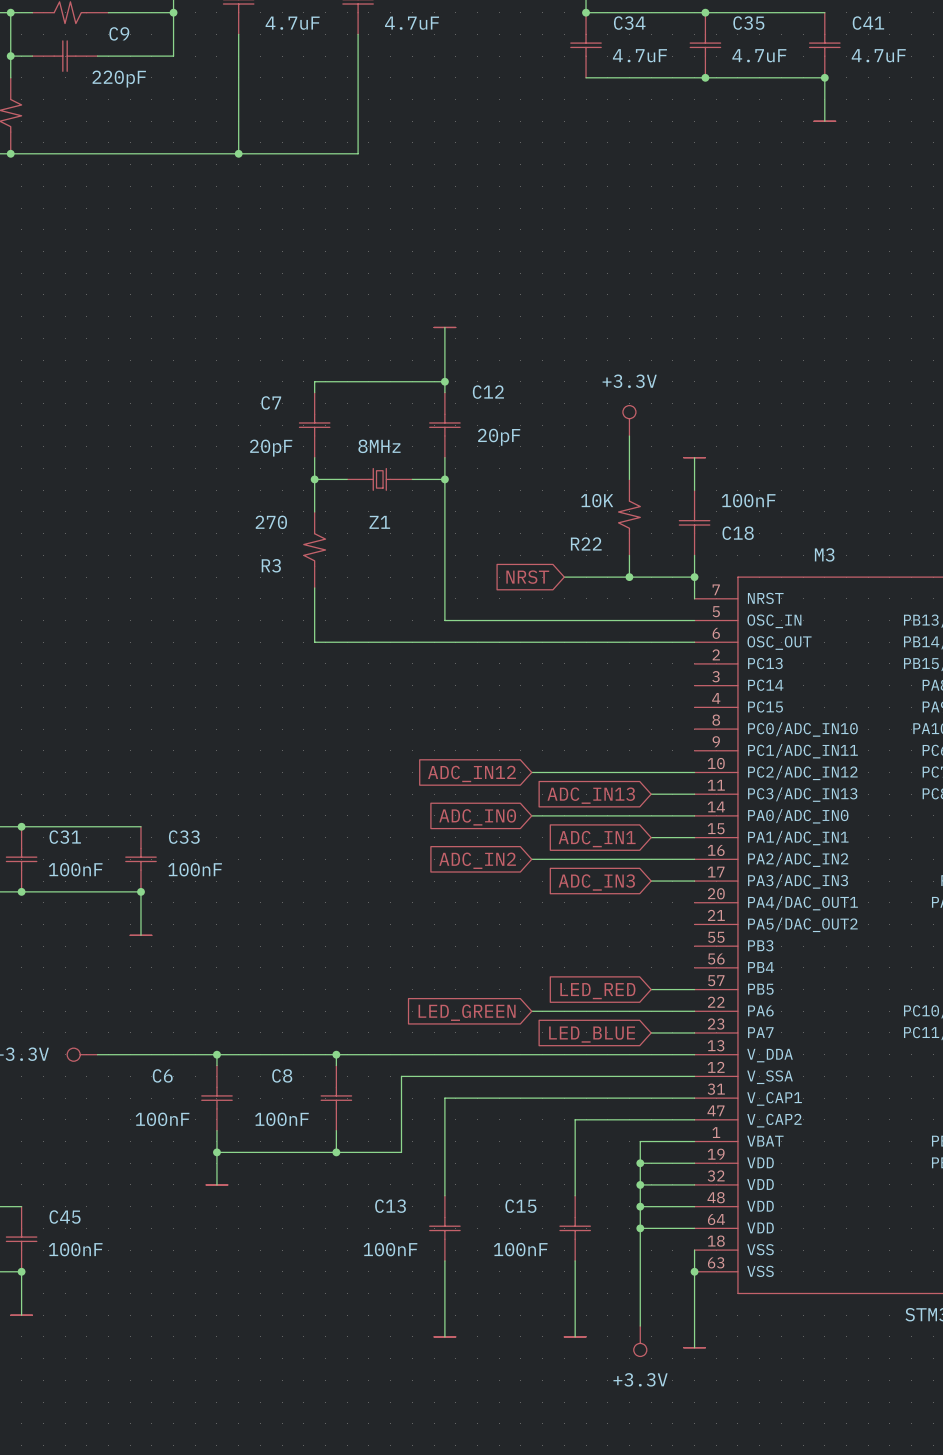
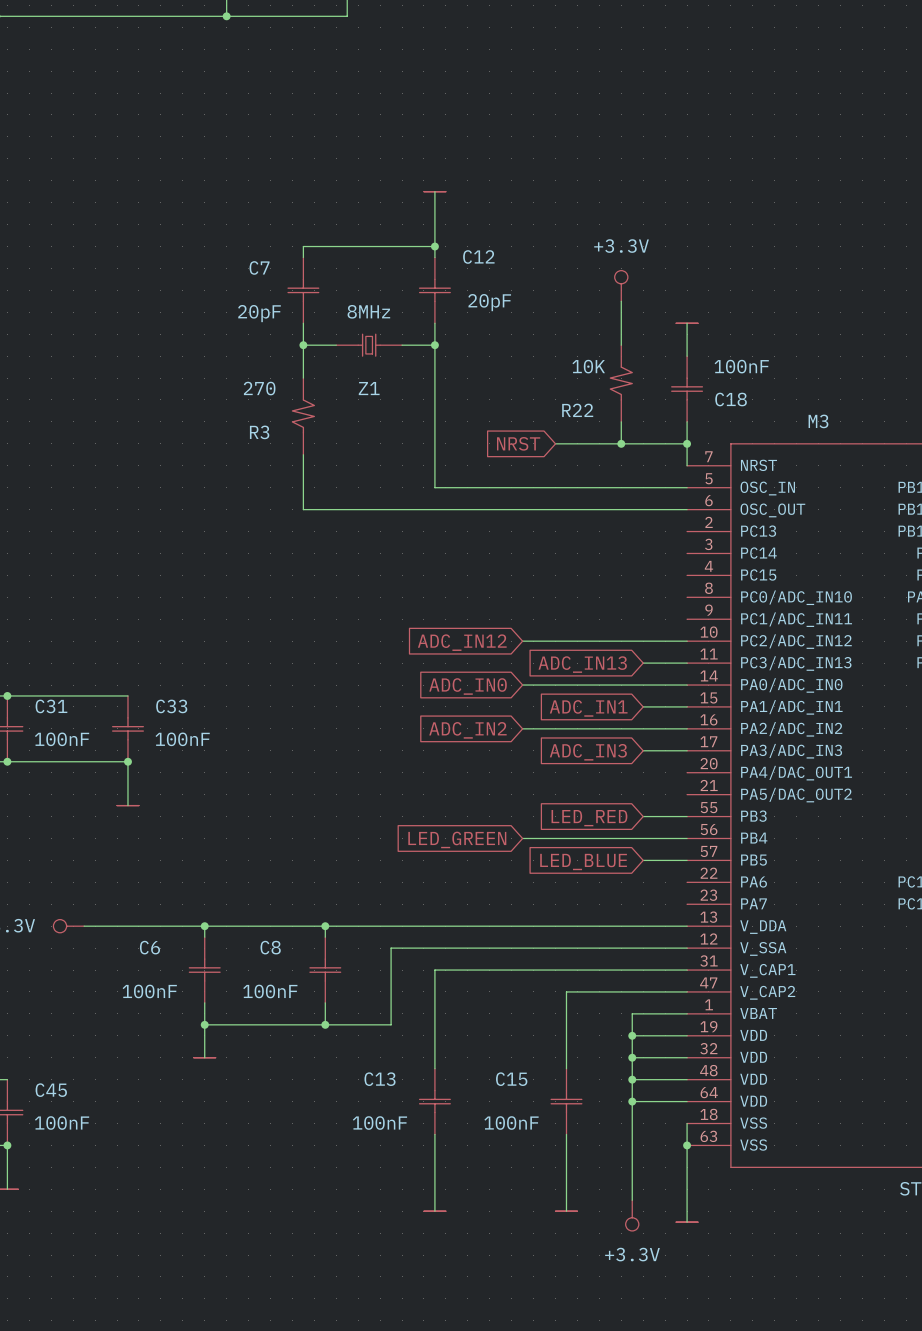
global label: none -> LED_RED (589, 818)
global label: LED_RED (597, 991) -> LED_BLUE (583, 862)
wire: (531, 1011) (694, 1011) -> (522, 838) (687, 838)
global label position: LED_GREEN (467, 1012) -> LED_GREEN (457, 839)
wire: (651, 1032) (694, 1032) -> (643, 816) (687, 816)
global label: LED_BLUE (592, 1034) -> none

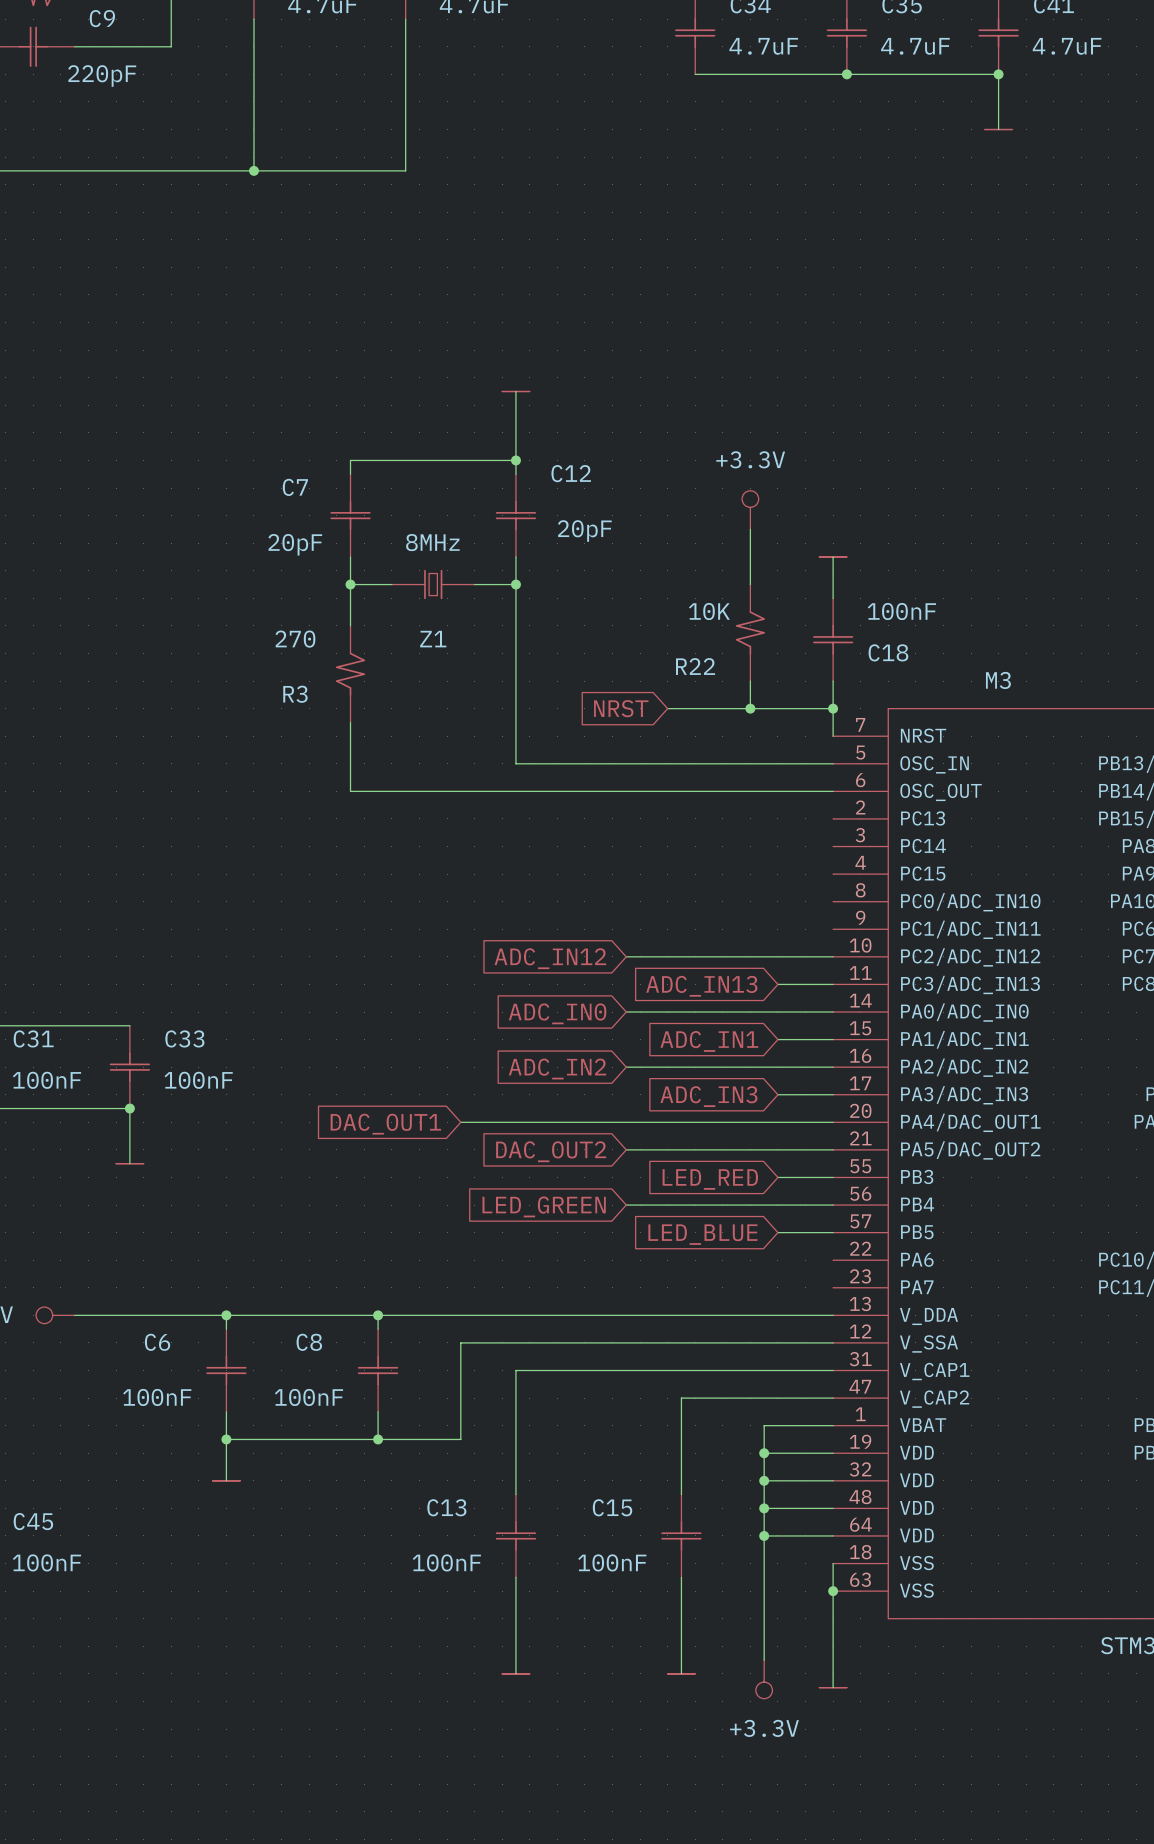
wire: none -> (460, 1122) (833, 1122)
global label: none -> DAC_OUT1 (385, 1124)
wire: none -> (626, 1149) (833, 1149)
global label: none -> DAC_OUT2 (551, 1151)

